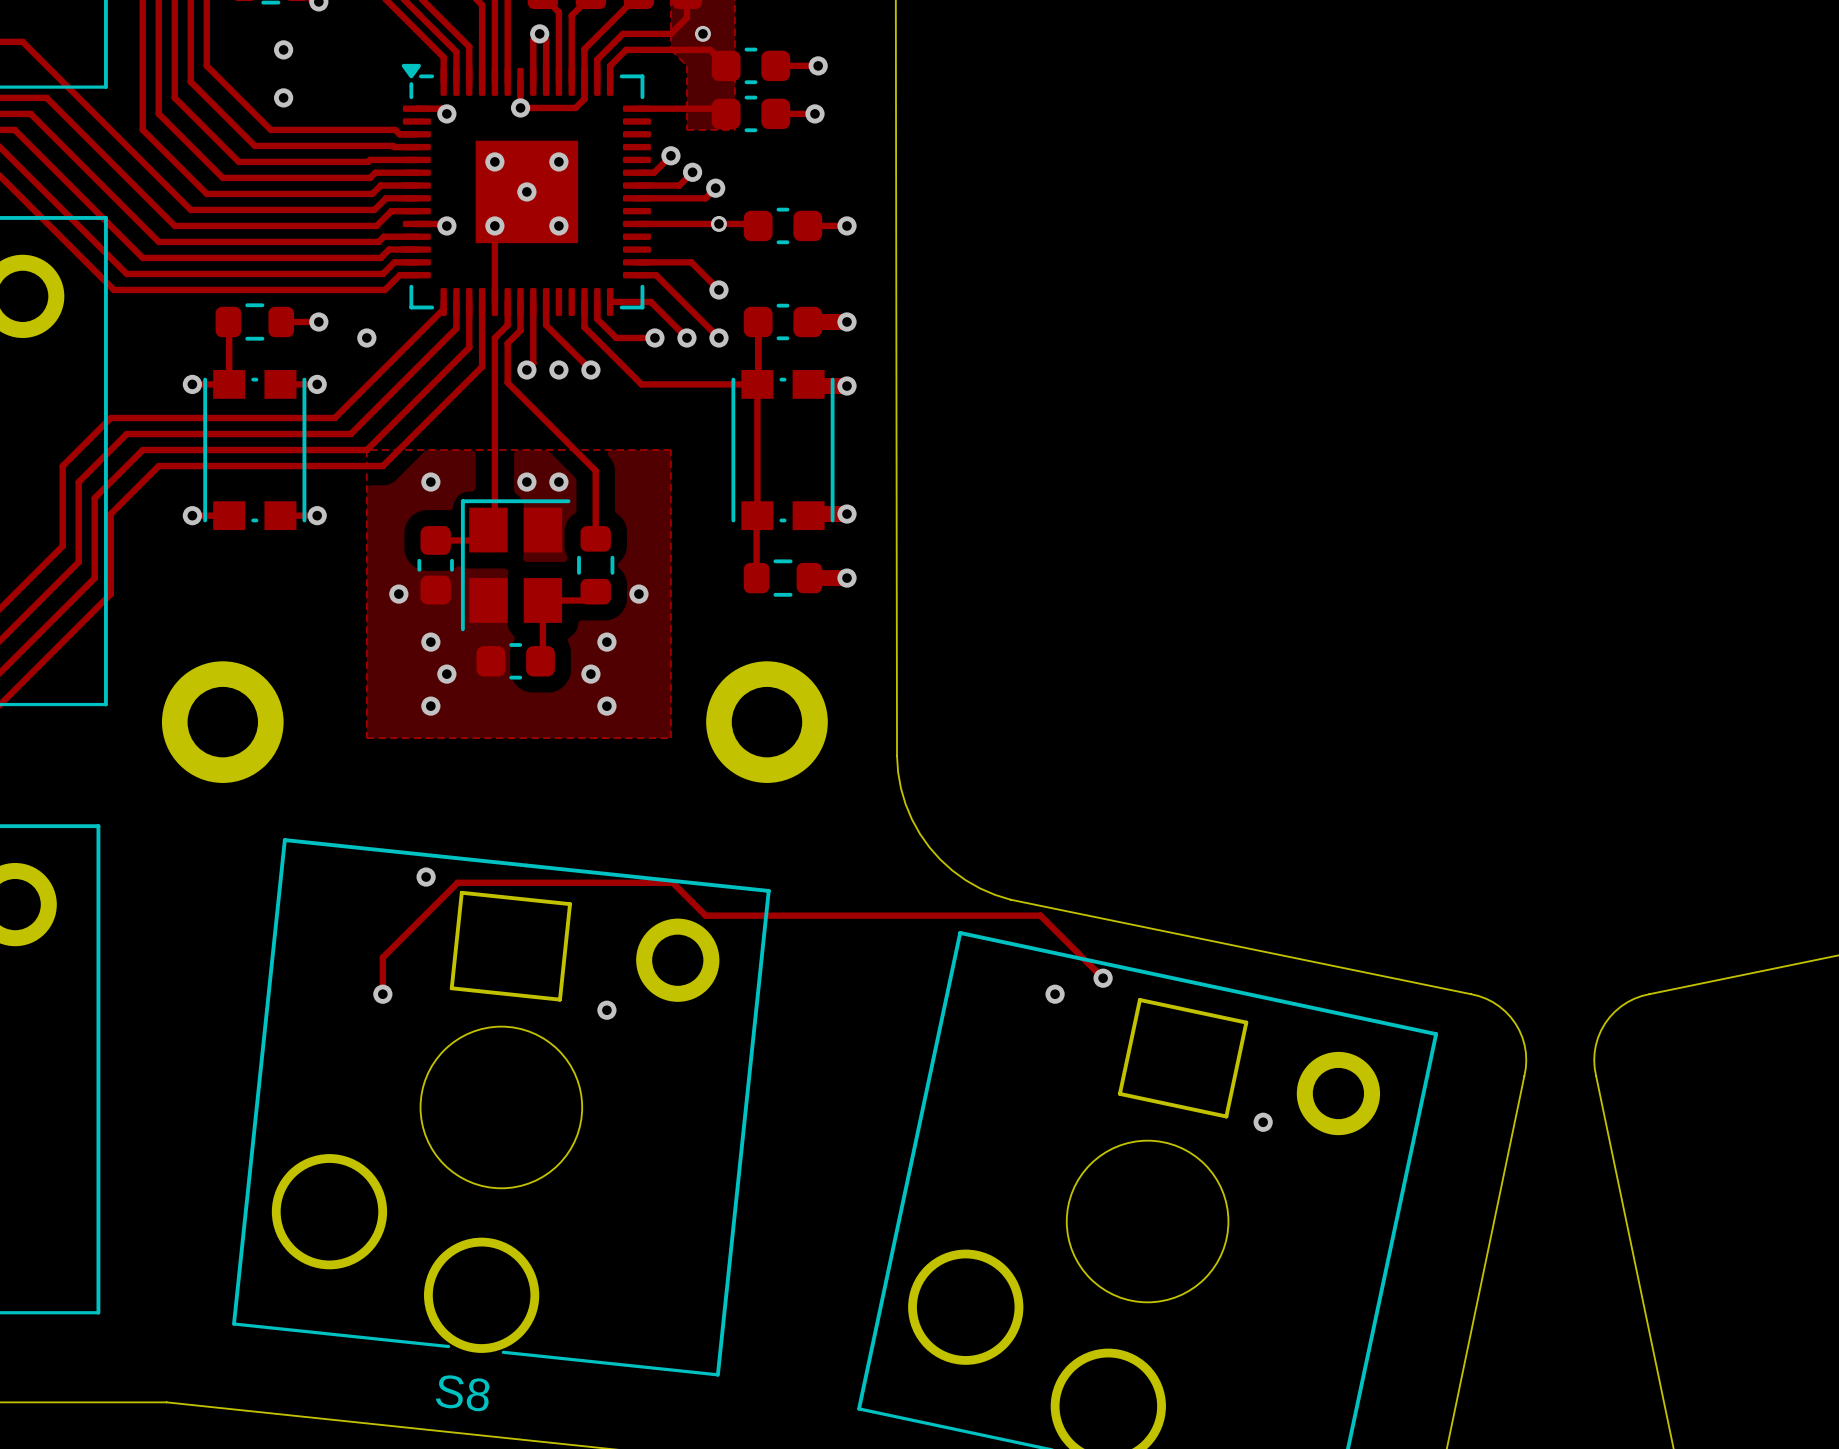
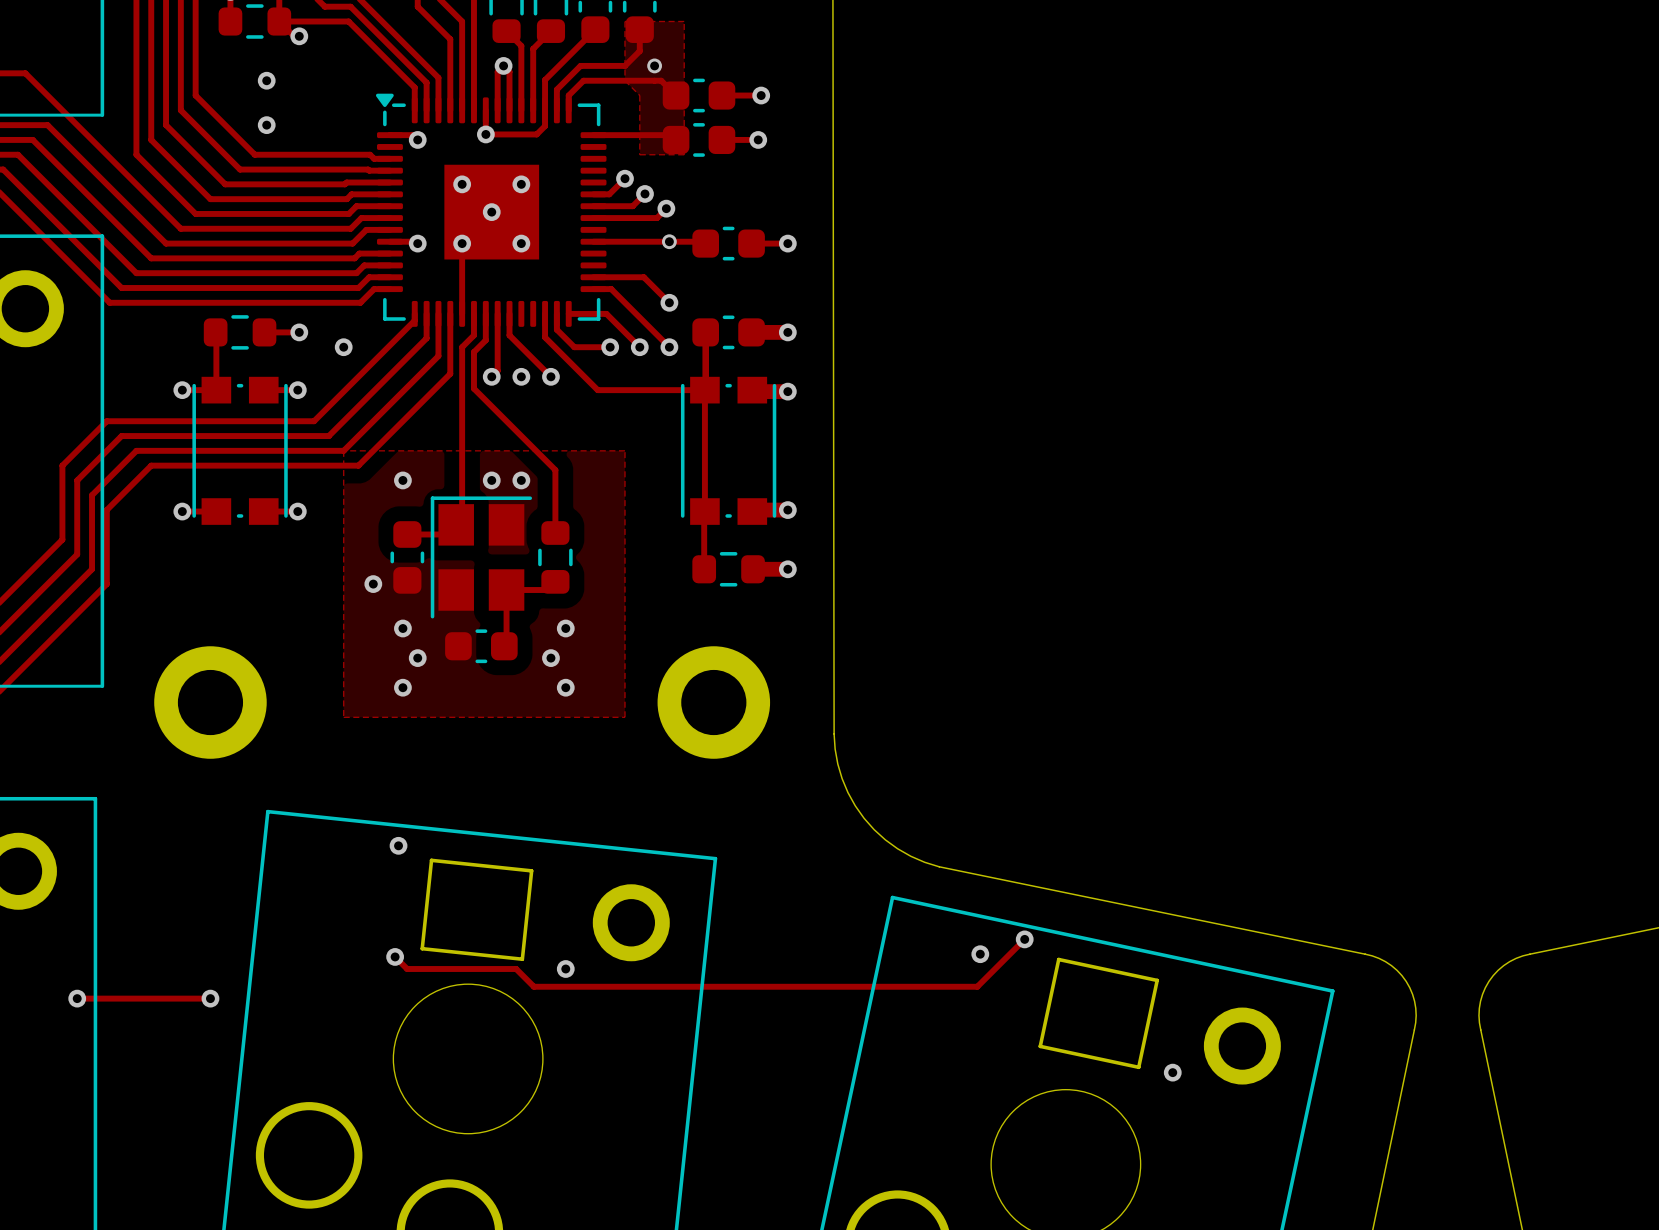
via: (638, 594) -> none
track: (1103, 978) (1040, 915) (705, 915) (672, 882) (457, 882) (382, 957) (382, 994) -> (1024, 939) (977, 986) (533, 986) (516, 969) (407, 969) (395, 956)
via position: (382, 994) -> (395, 956)
track: none -> (77, 998) (210, 998)
via: none -> (77, 998)
via: none -> (210, 998)

